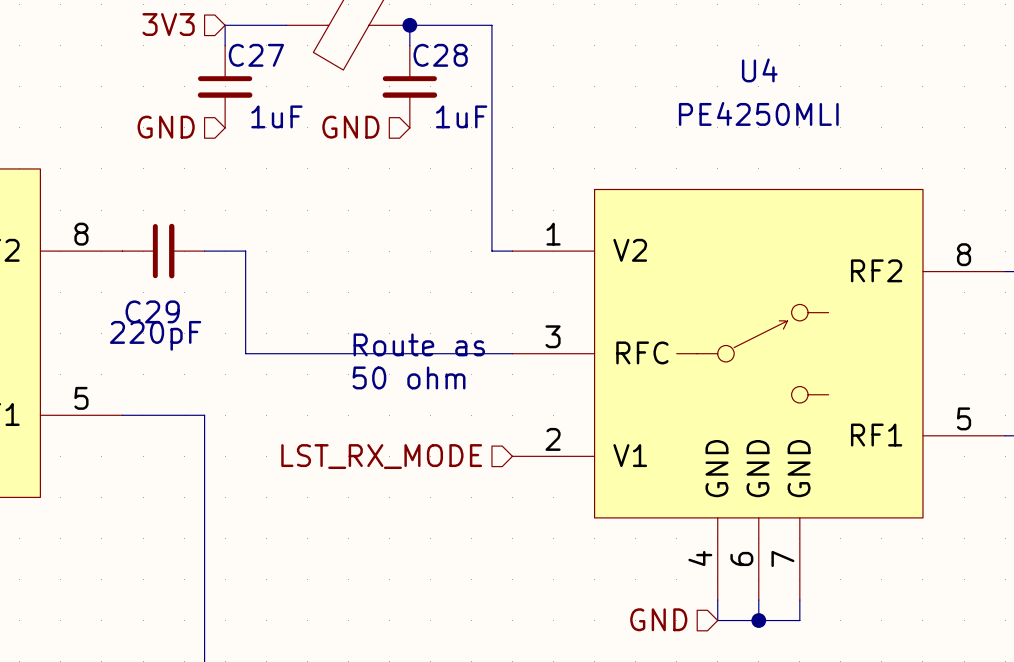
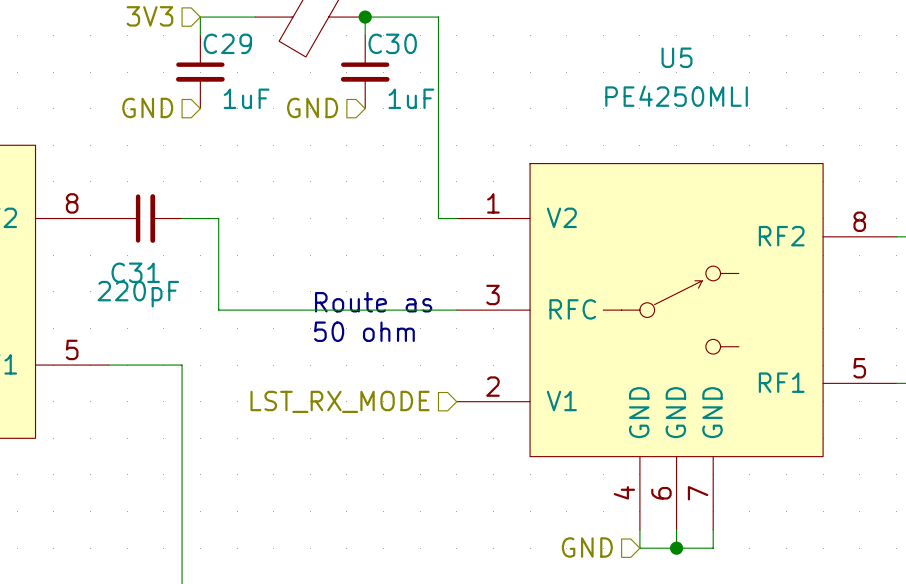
C27 name: C27 (256, 55) -> C29 (227, 43)
C28 name: C28 (440, 55) -> C30 (392, 43)
U4 name: U4 (759, 70) -> U5 (677, 57)
C29 name: C29 (152, 311) -> C31 (135, 272)

